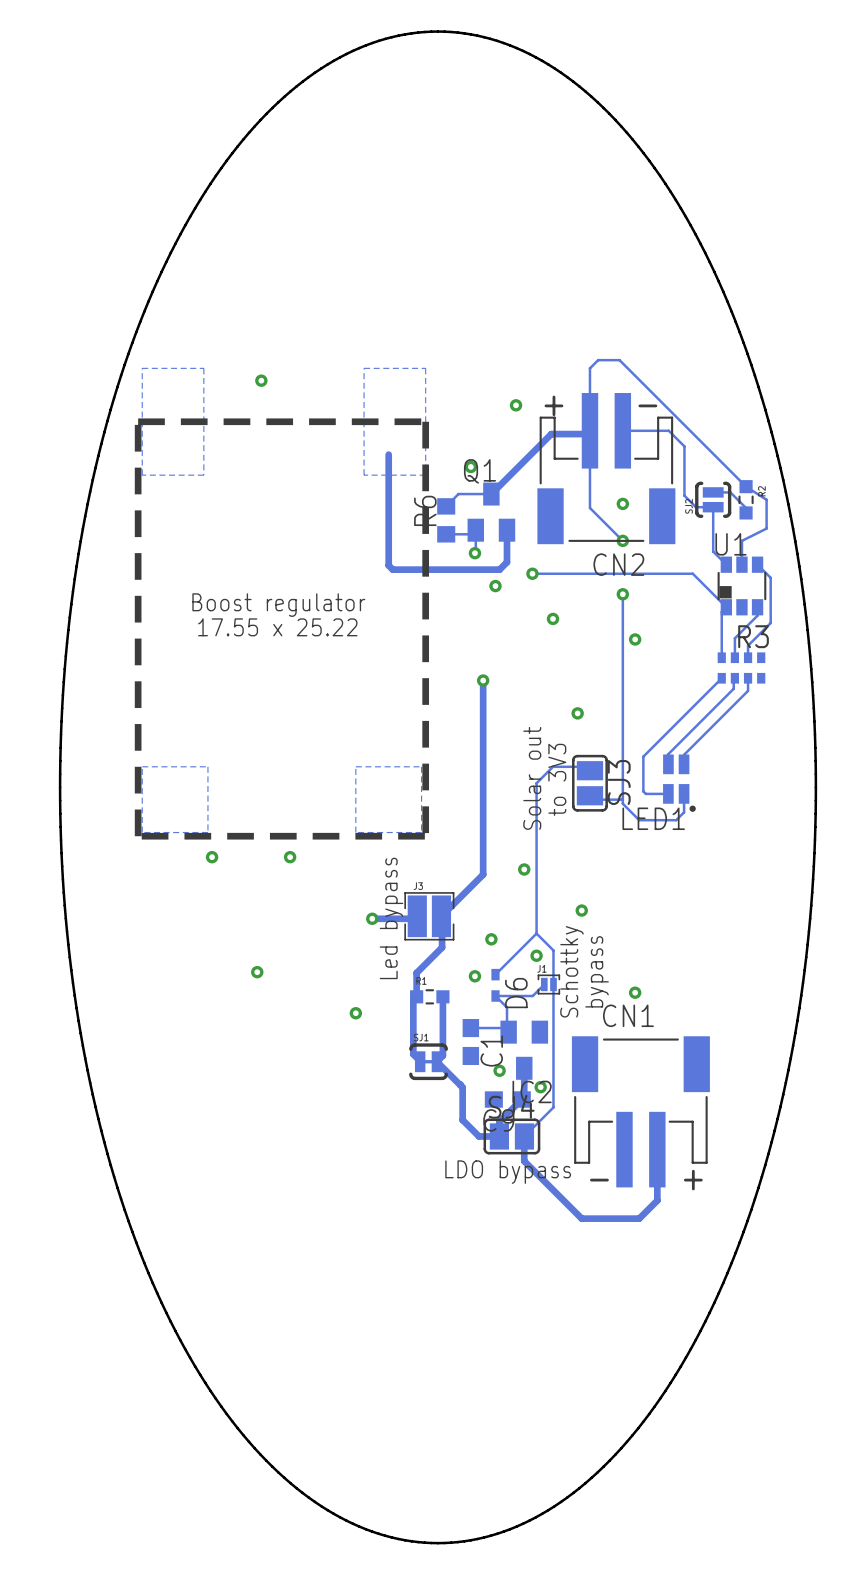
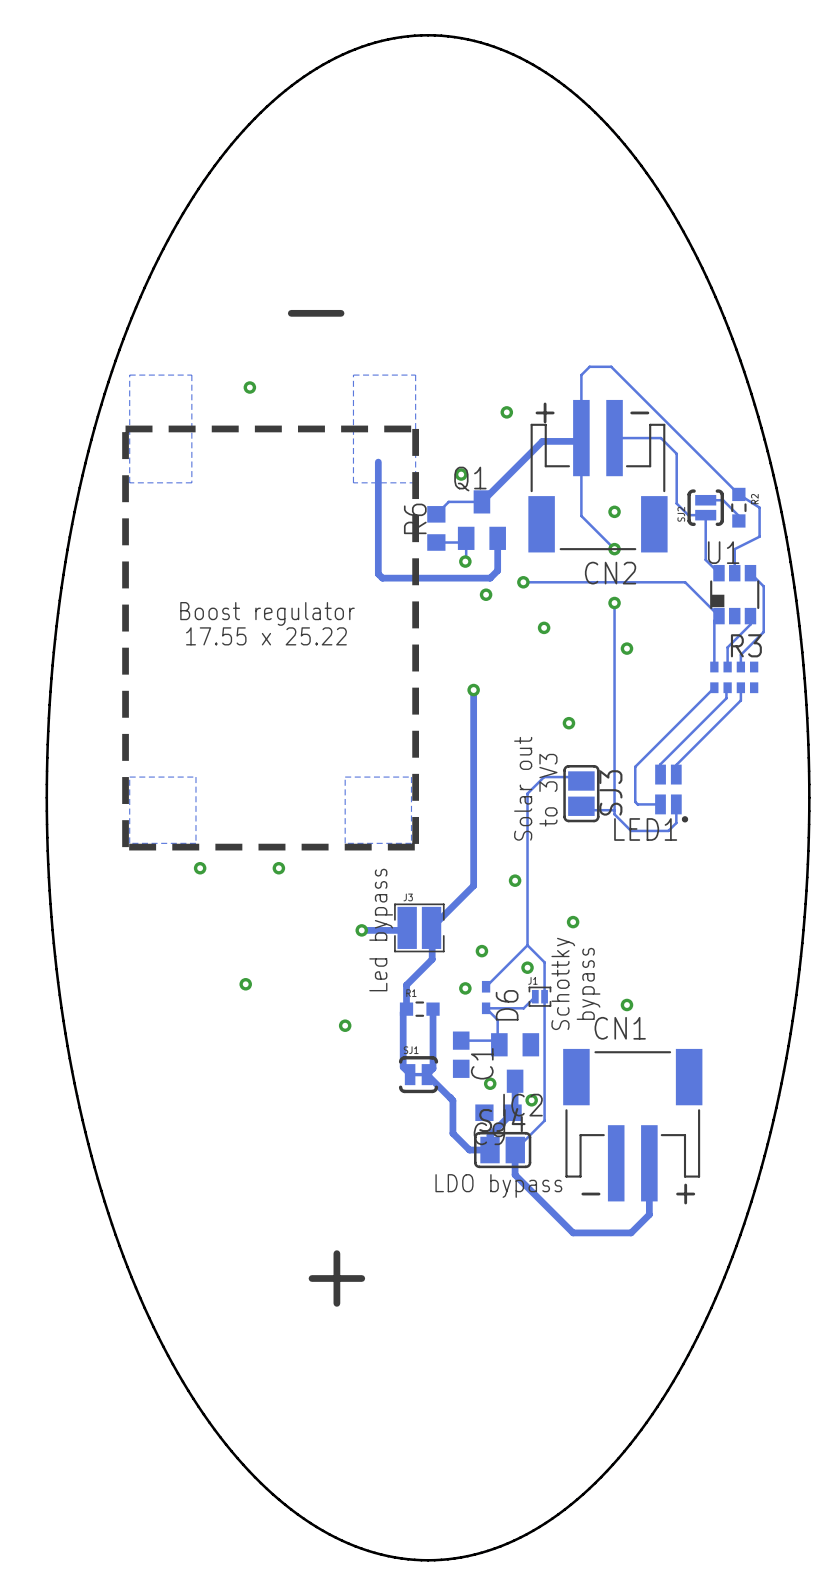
line: none -> (341, 313) (291, 313)
line: none -> (336, 1253) (336, 1303)
line: none -> (361, 1278) (312, 1278)

